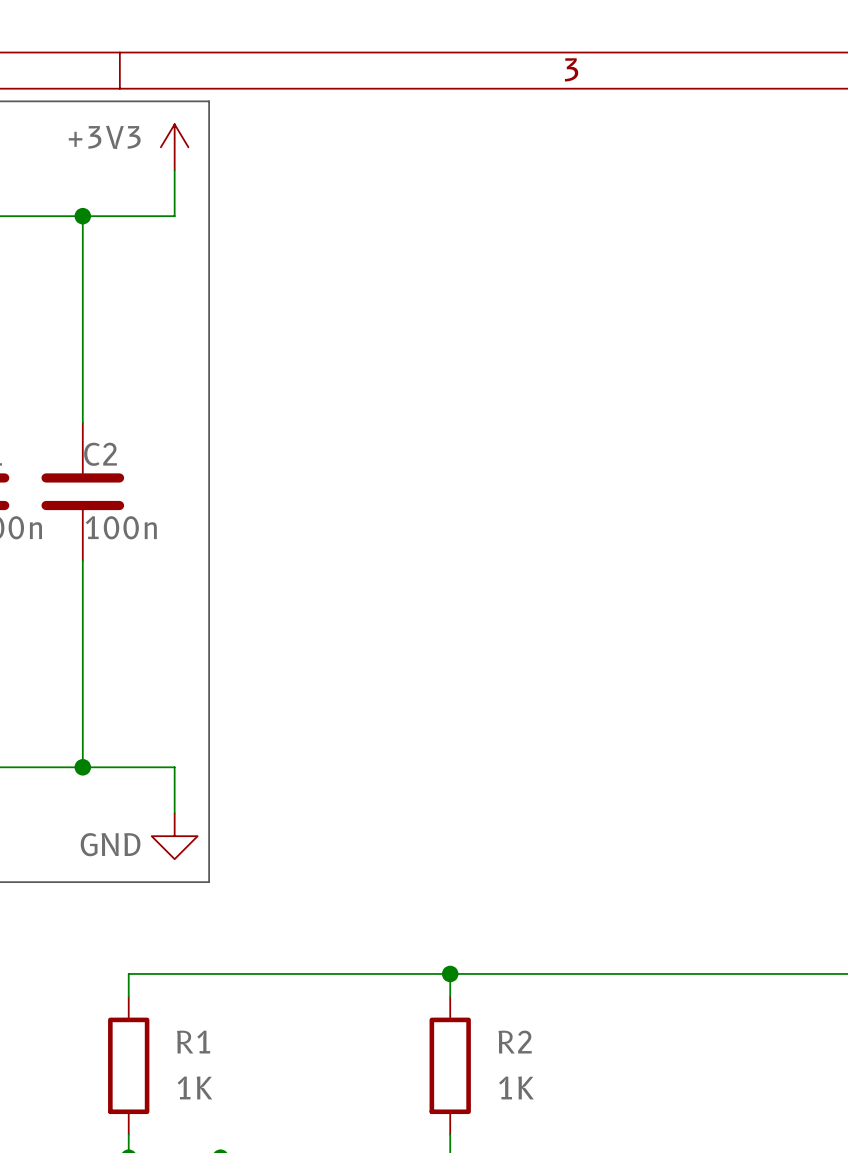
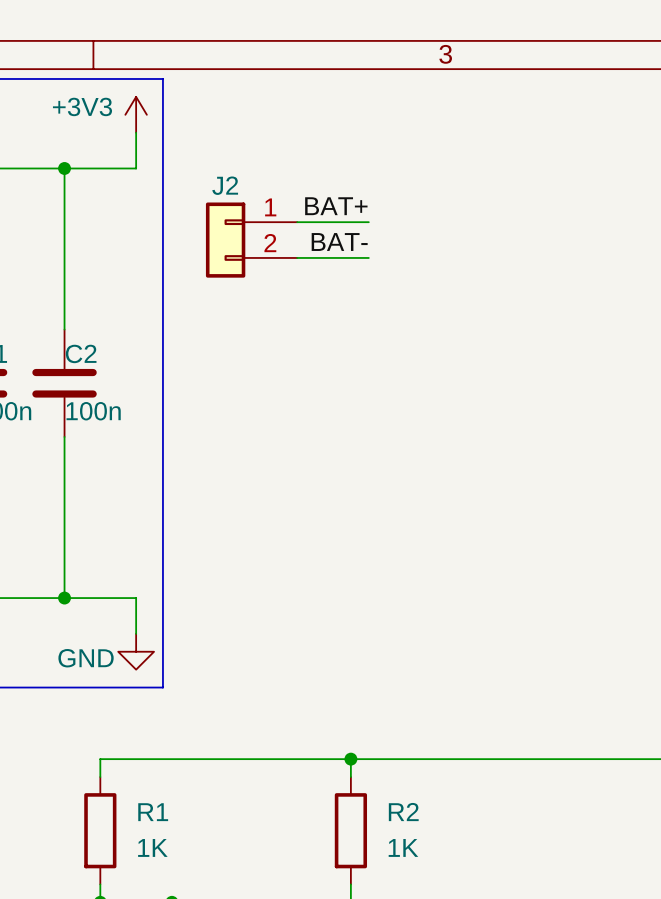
label: none -> BAT+ (336, 206)
wire: none -> (297, 222) (368, 222)
J2: none -> (251, 240)
label: none -> BAT- (339, 242)
wire: none -> (297, 257) (368, 257)

